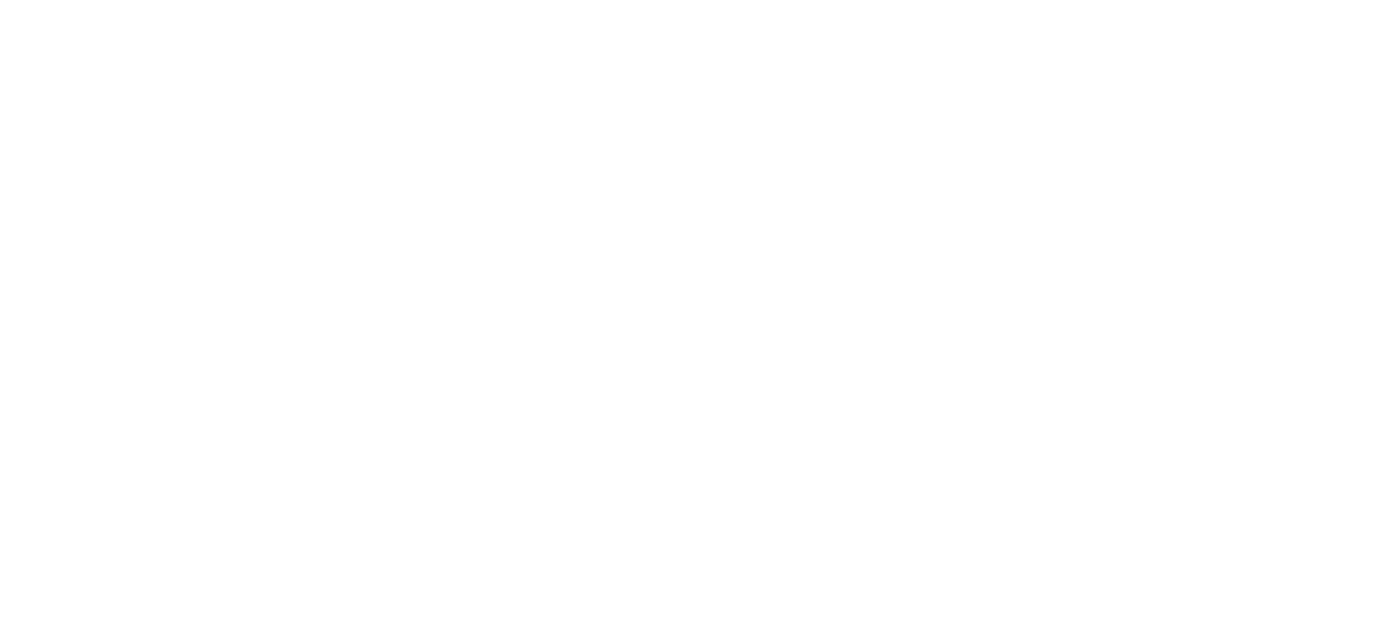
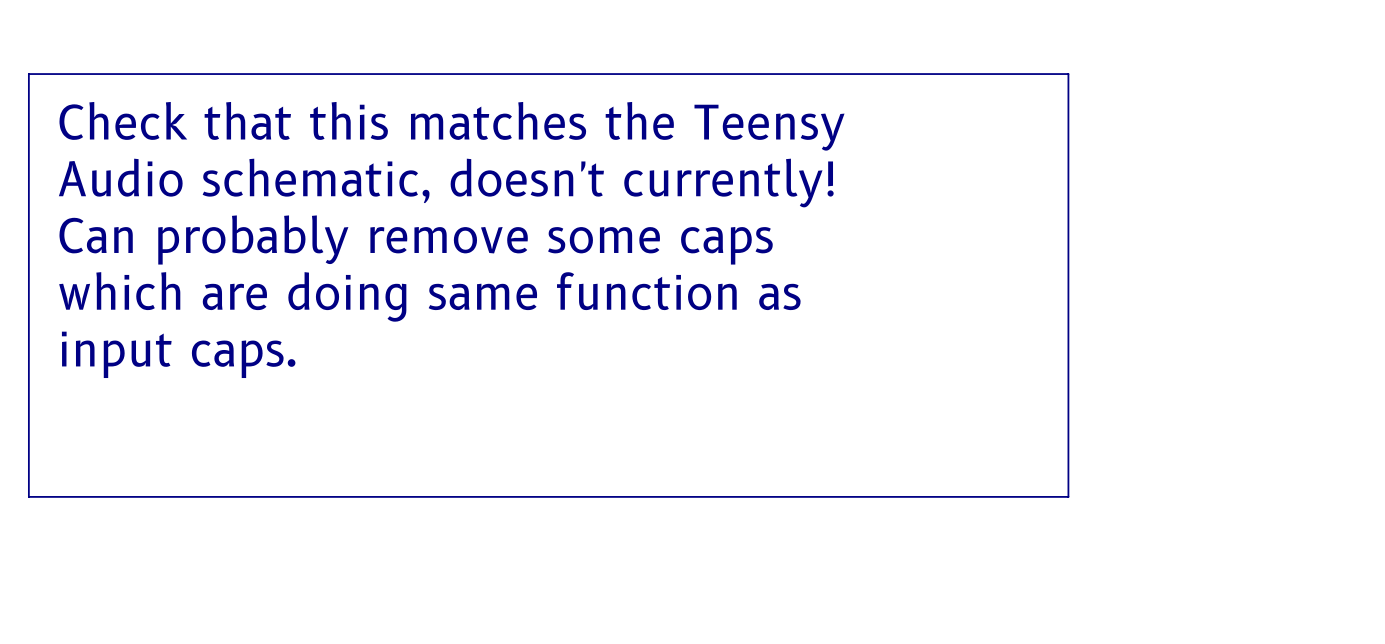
line: none -> (28, 74) (1068, 74) (1068, 496) (28, 496) (28, 74)
text: none -> Check that this matches the Teensy (452, 126)
text: none -> Audio schematic, doesn't currently! (446, 183)
text: none -> Can probably remove some caps (416, 239)
text: none -> which are doing same function as (429, 296)
text: none -> input caps. (178, 354)

